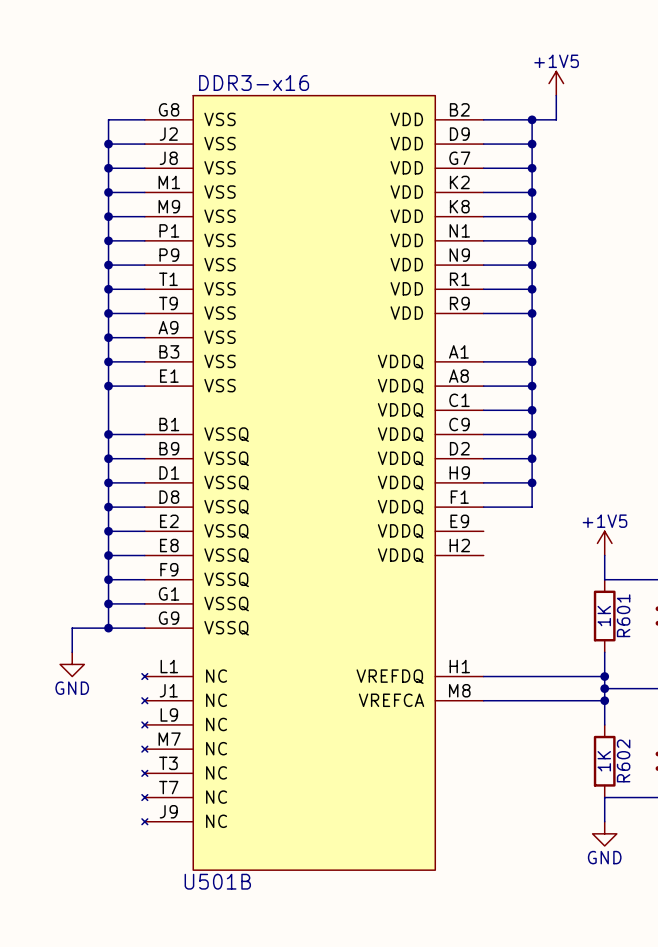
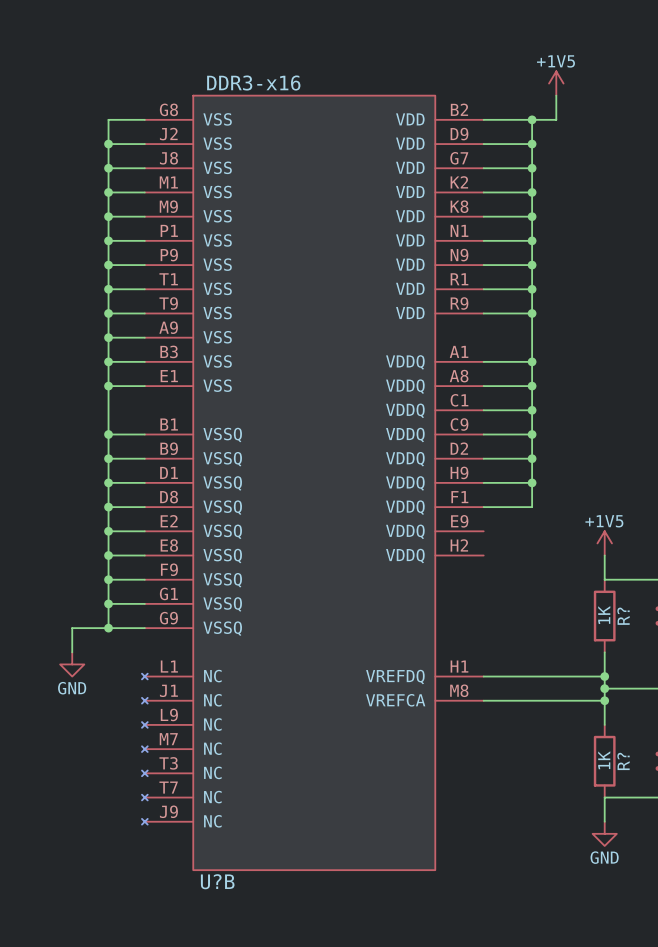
R601 name: R601 (623, 615) -> R? (623, 616)
R602 name: R602 (623, 760) -> R? (623, 761)
U501B name: U501B (217, 881) -> U?B (217, 881)

